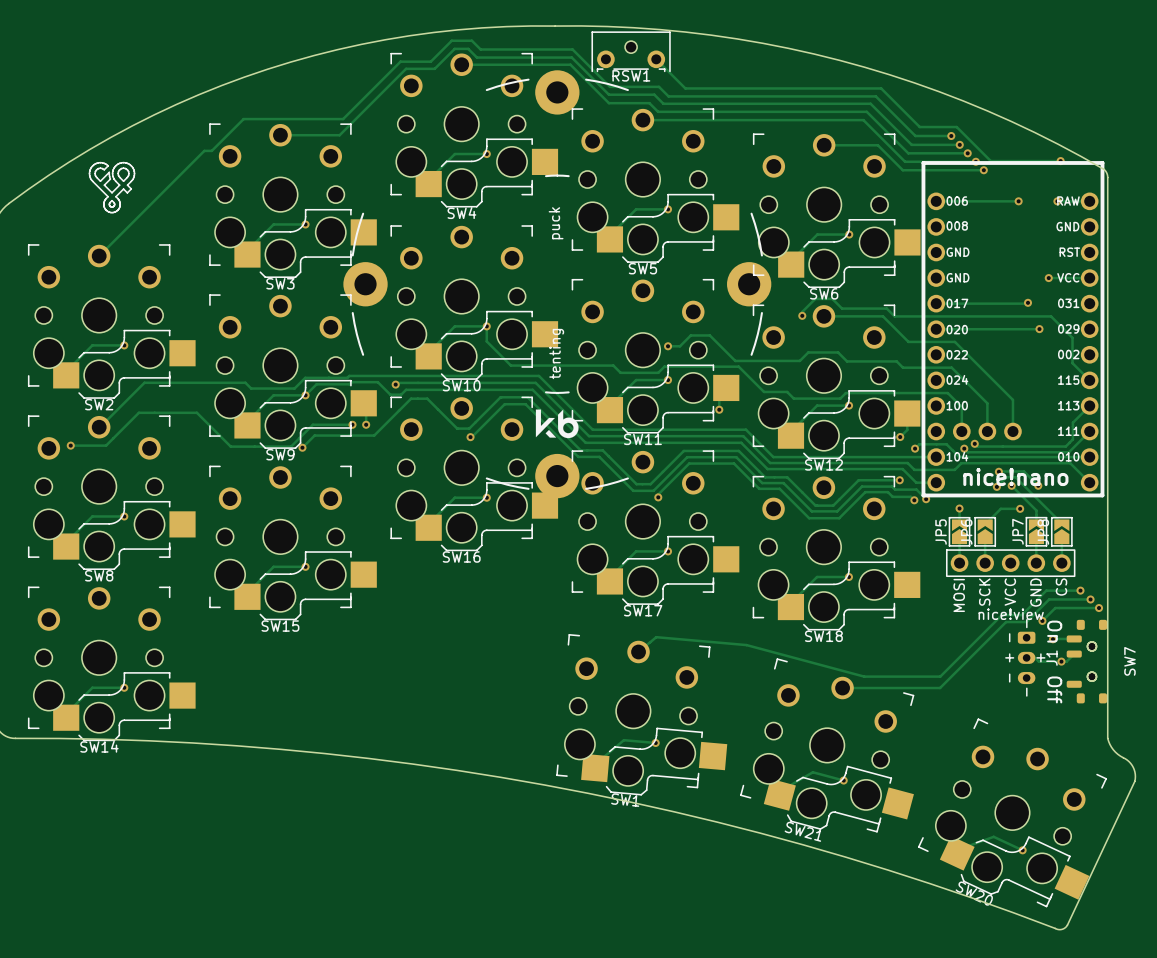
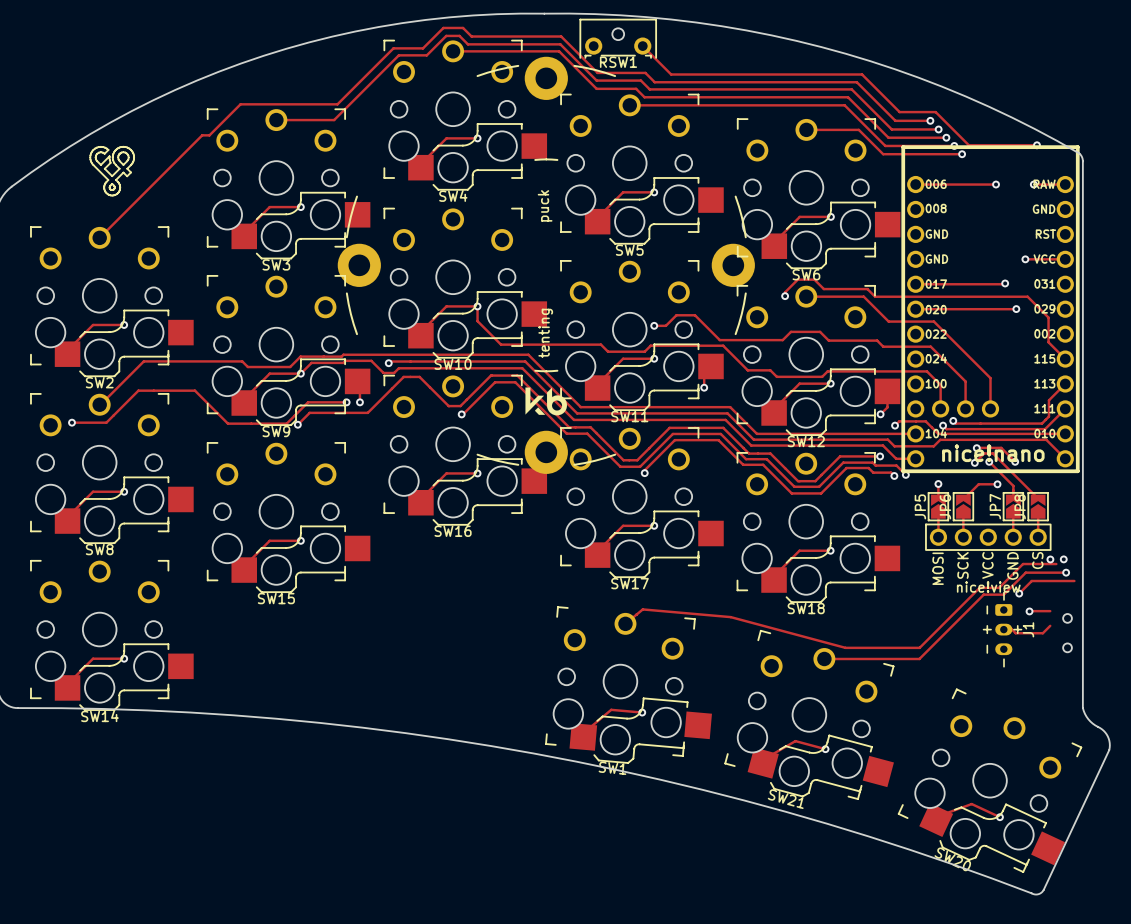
via: none -> (1050, 559)
via: none -> (1063, 559)
via: (1080, 590) -> none
via: (1099, 608) -> none
via: (1061, 661) -> none
SW7: (1086, 661) -> none

